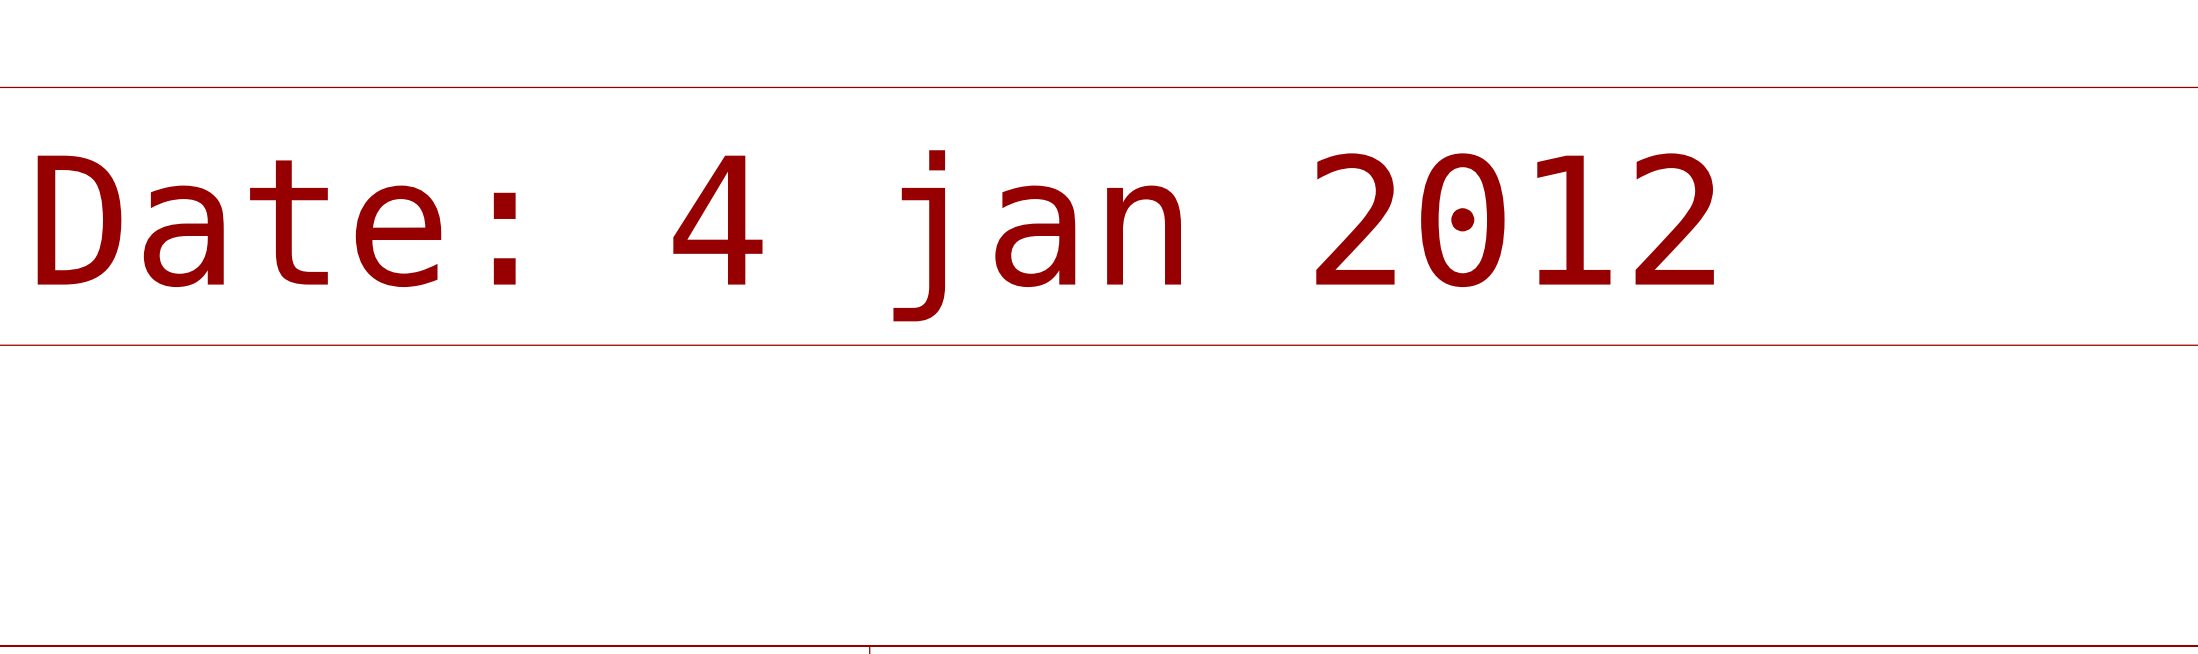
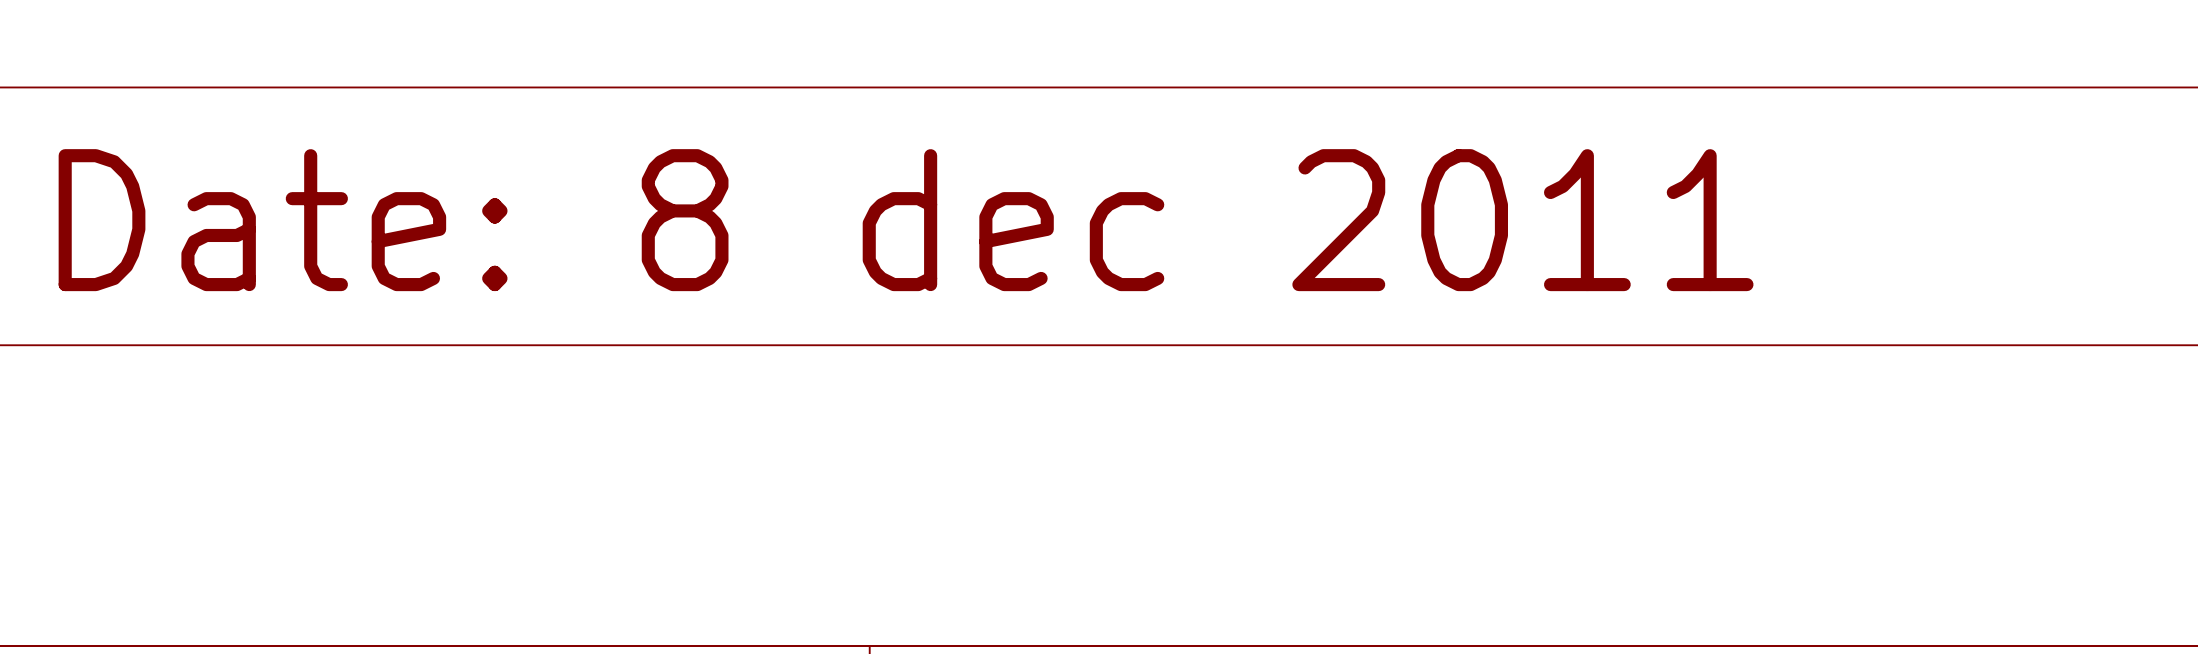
title block: Date: 4 jan 2012 (875, 235) -> Date: 8 dec 2011 (906, 220)

